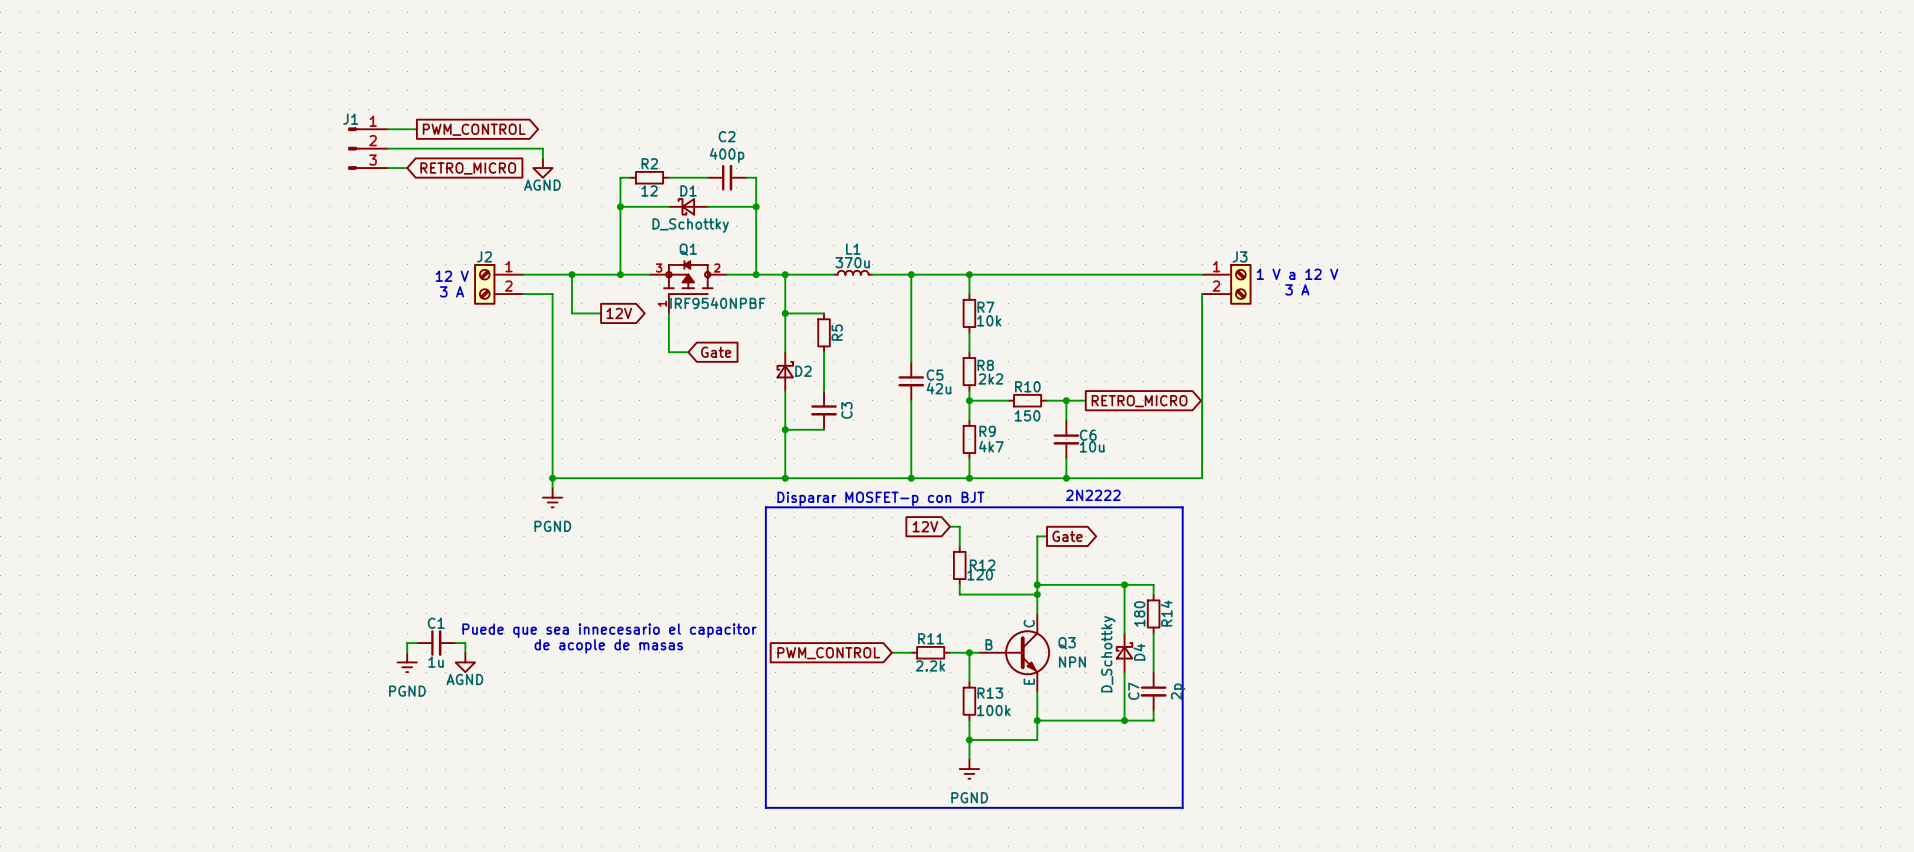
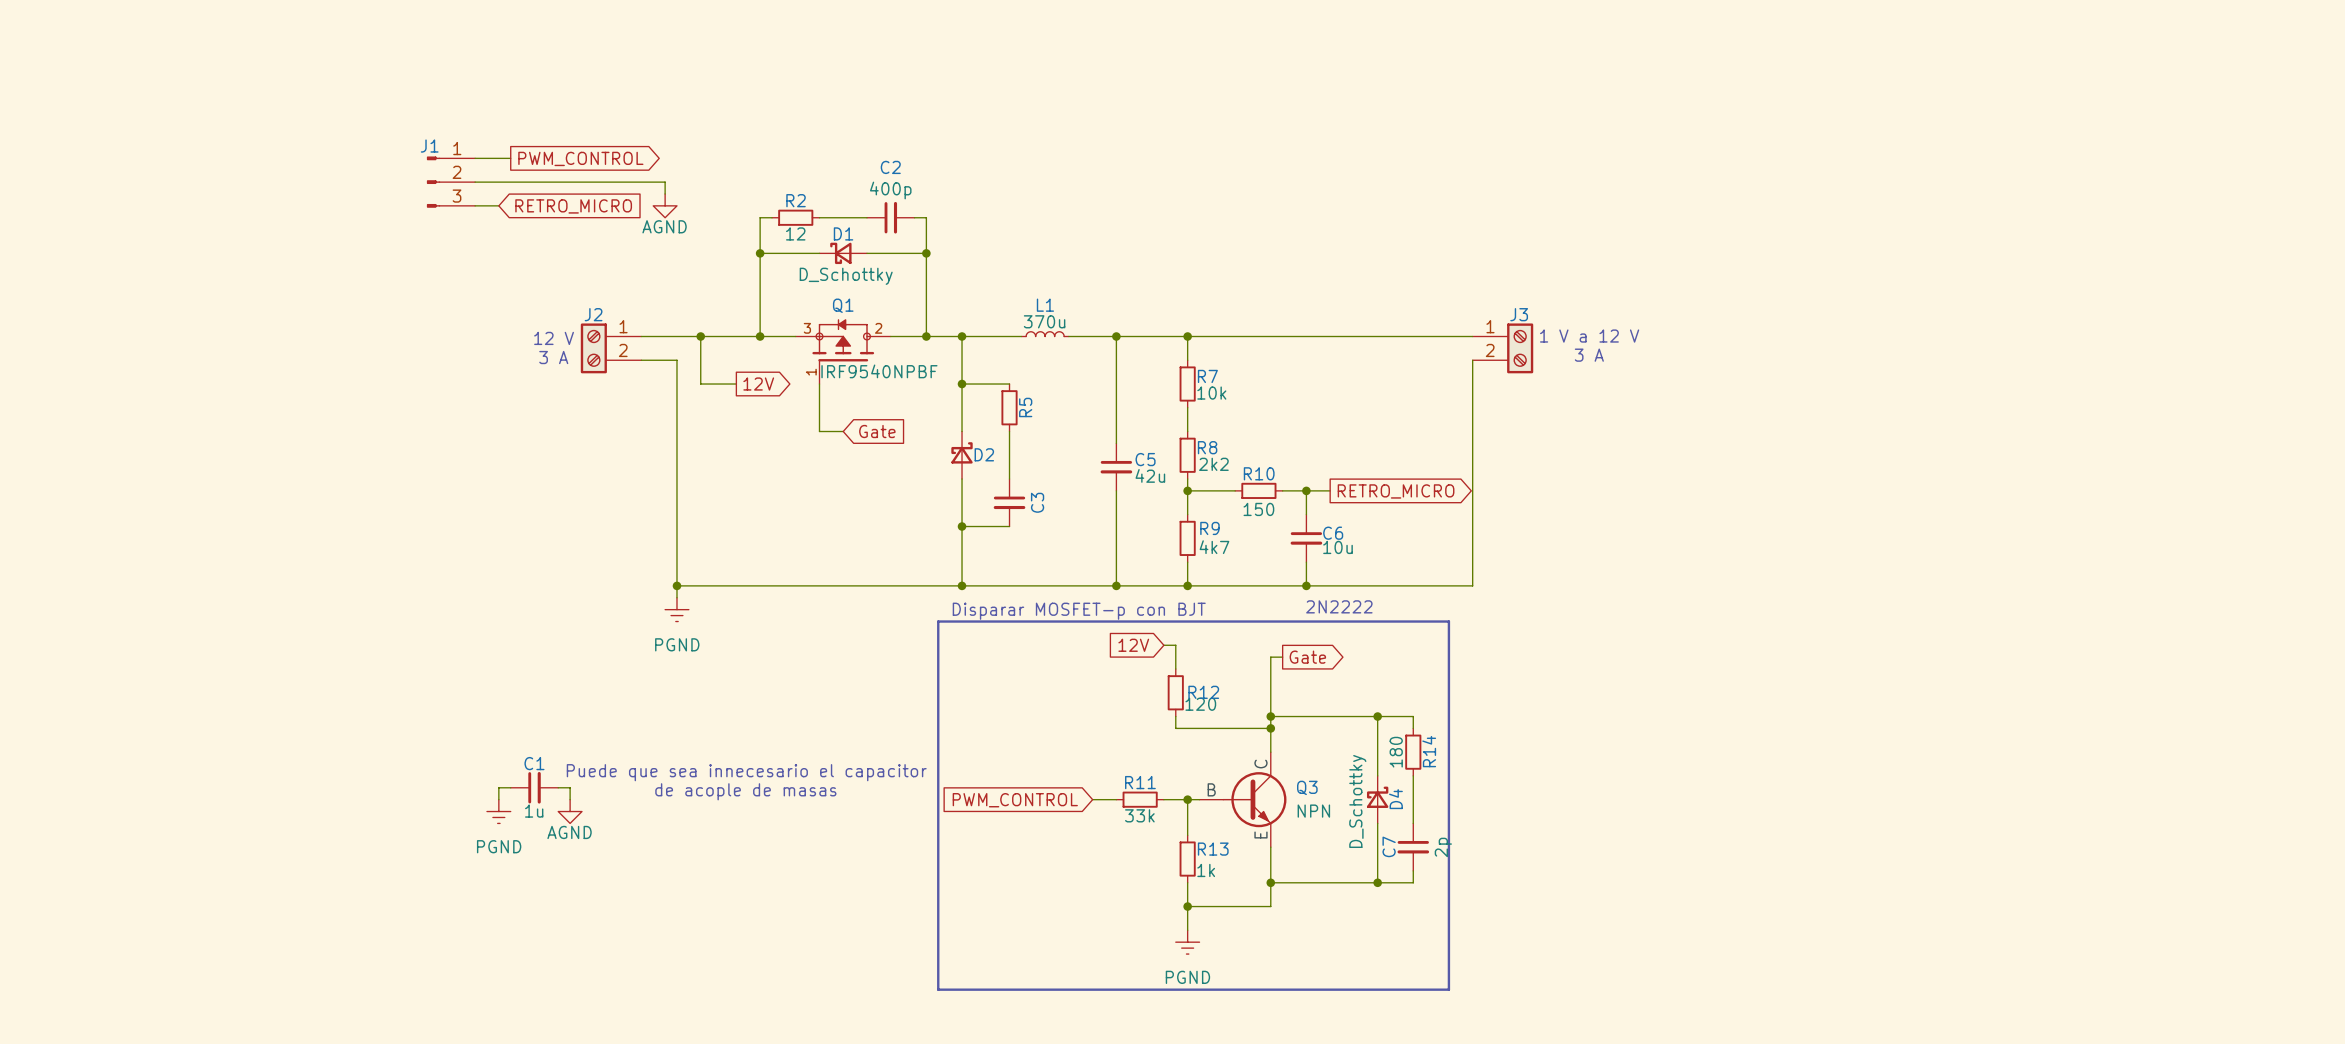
R11 value: 2.2k (930, 665) -> 33k (1139, 815)
R13 value: 100k (993, 710) -> 1k (1206, 870)

